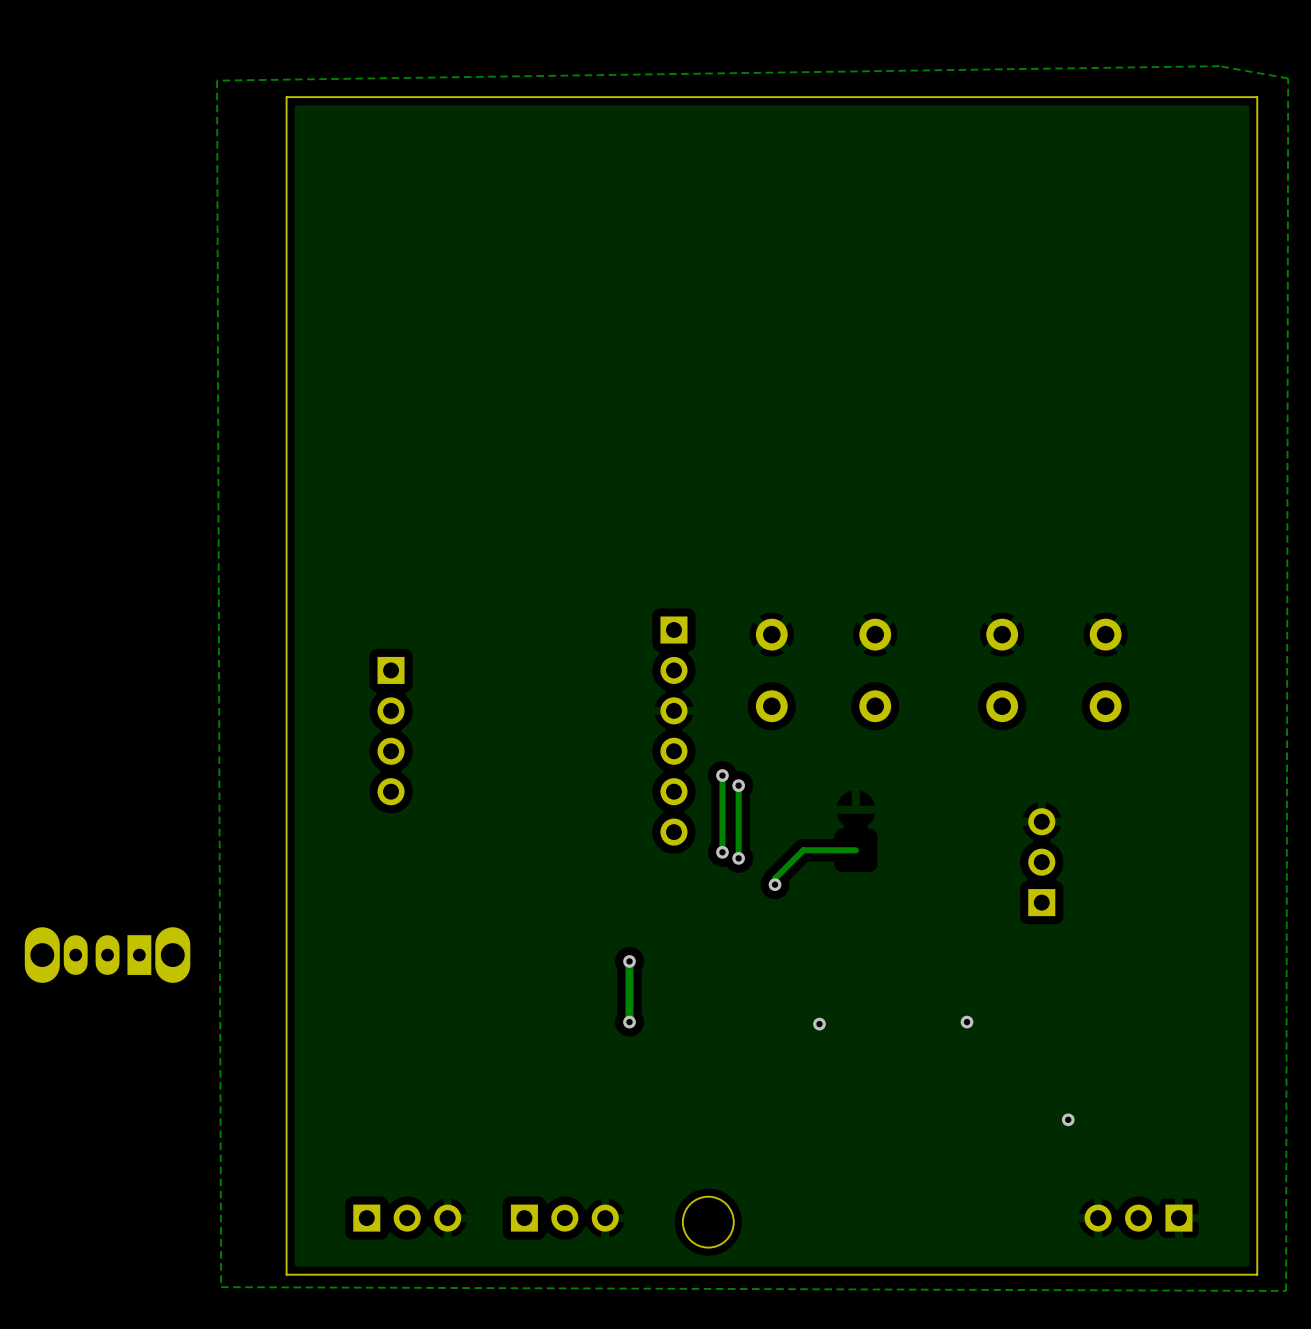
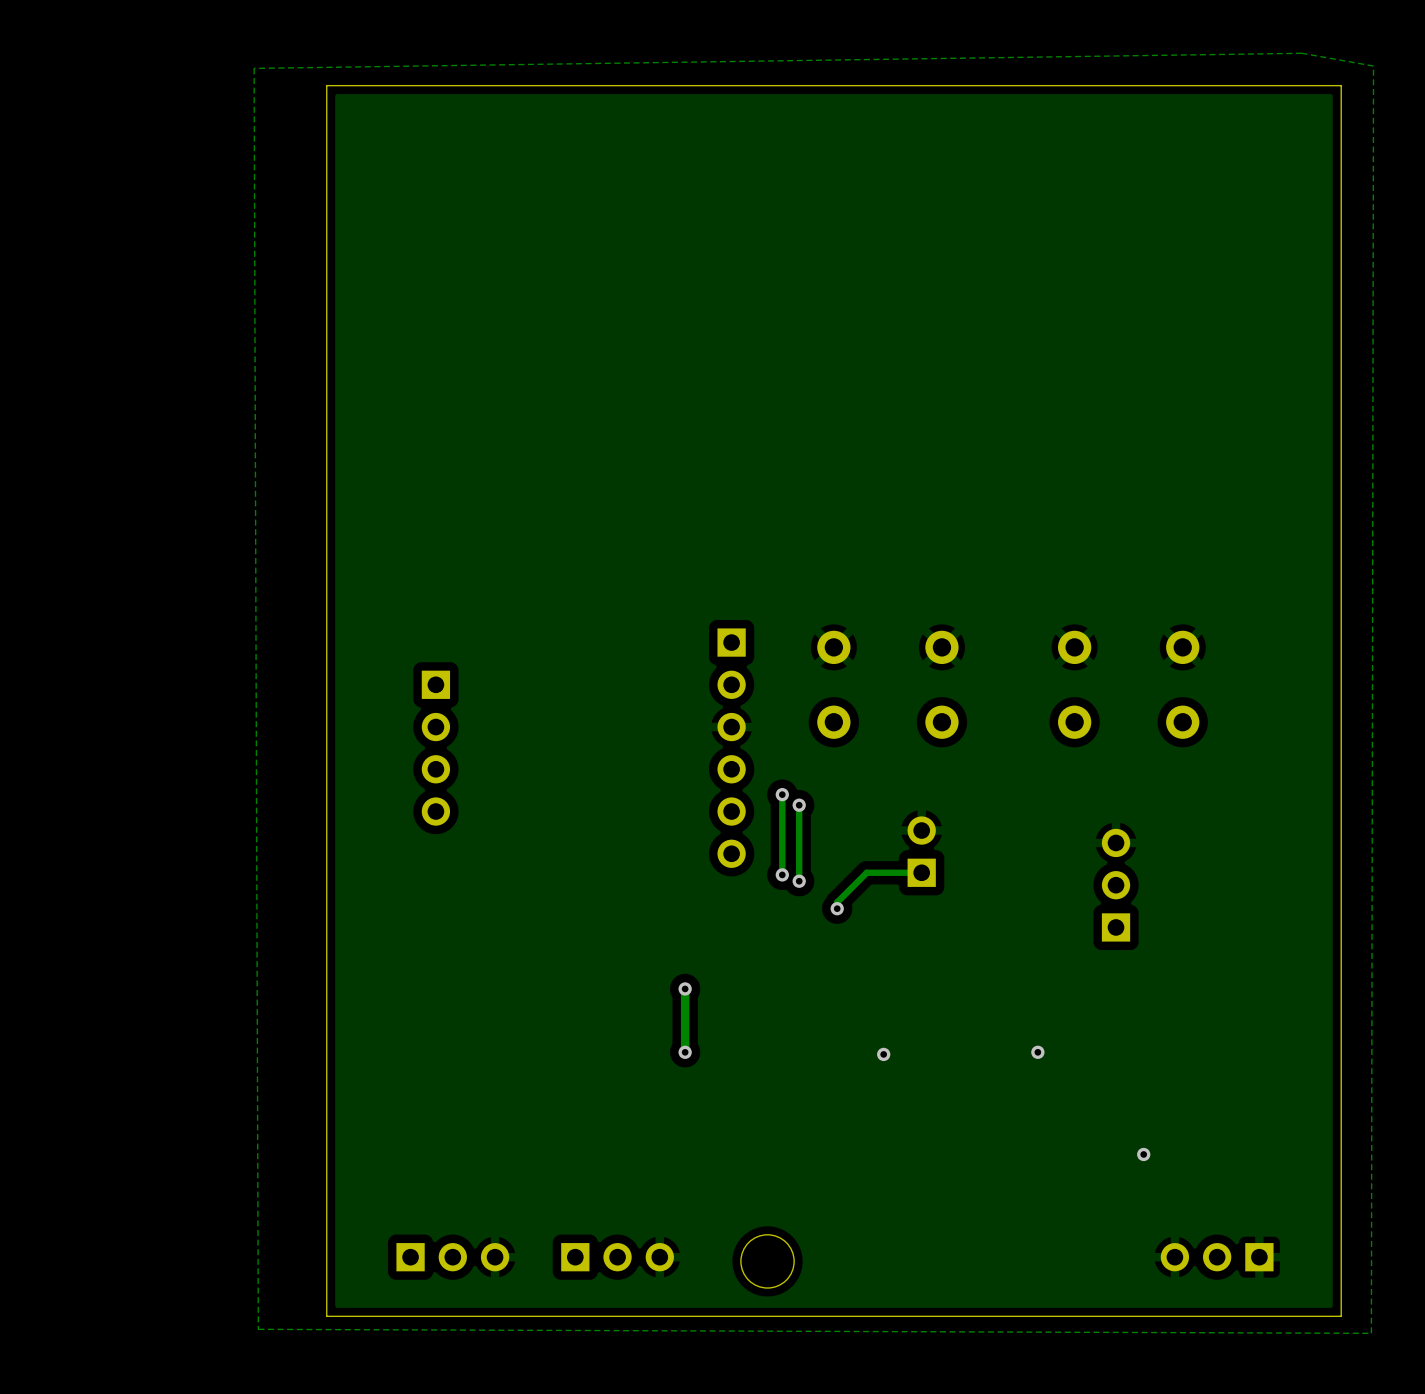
part: none -> (921, 851)
part: (107, 955) -> none

